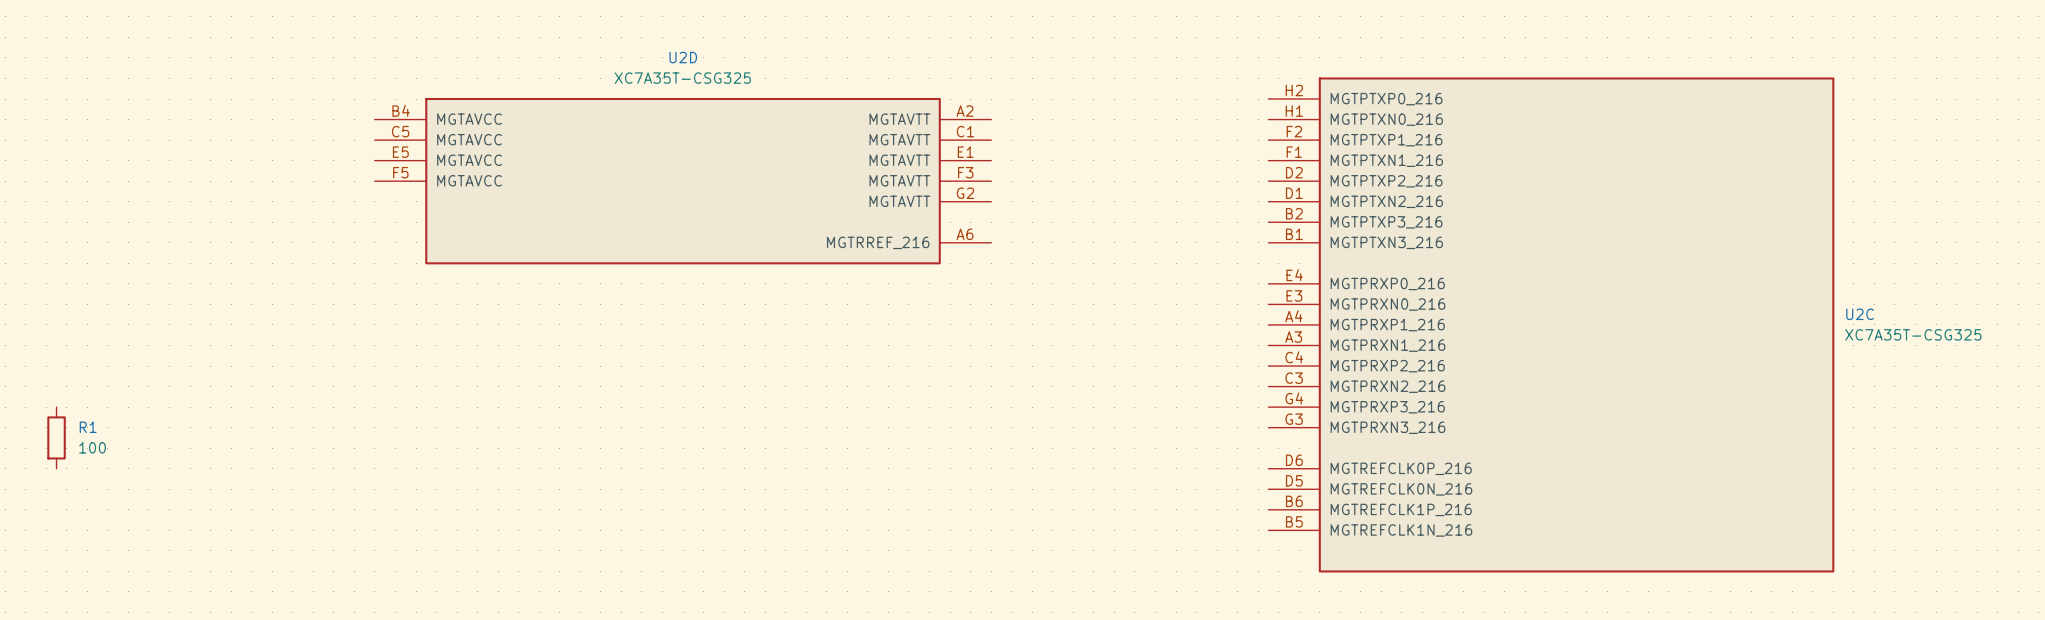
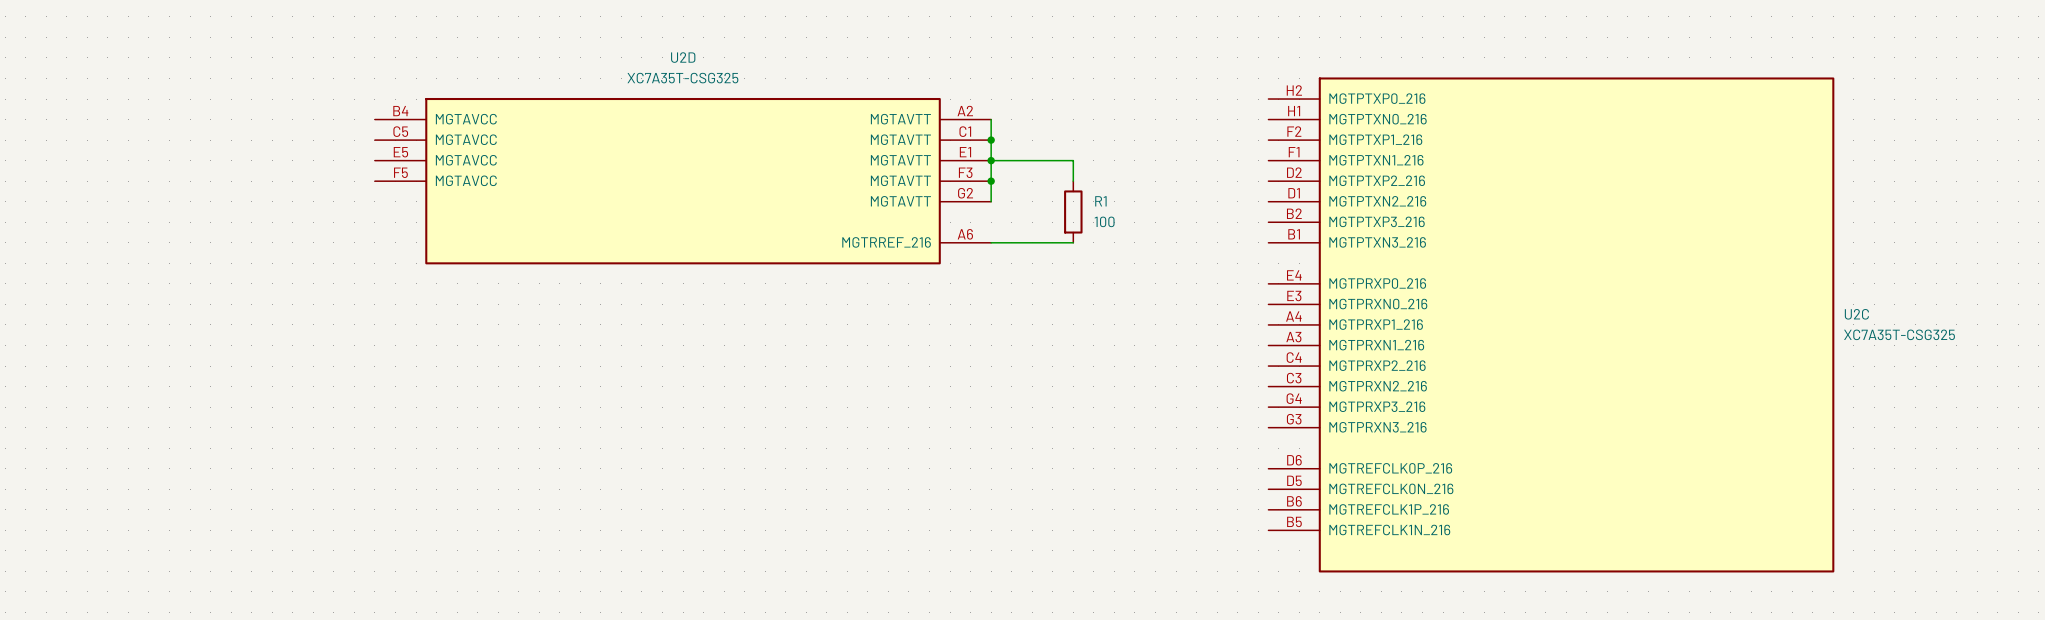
wire: none -> (991, 119) (991, 201)
junction: none -> (991, 140)
wire: none -> (991, 160) (1073, 160) (1073, 181)
junction: none -> (991, 160)
junction: none -> (991, 181)
wire: none -> (991, 242) (1073, 242)
R1 position: (56, 437) -> (1073, 211)

